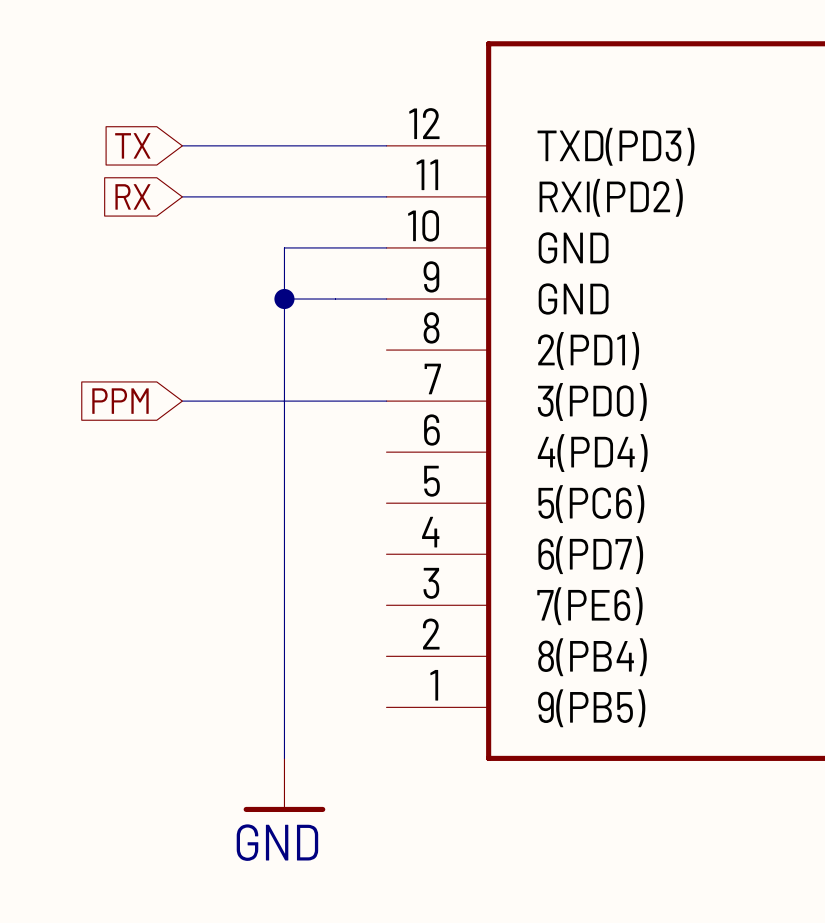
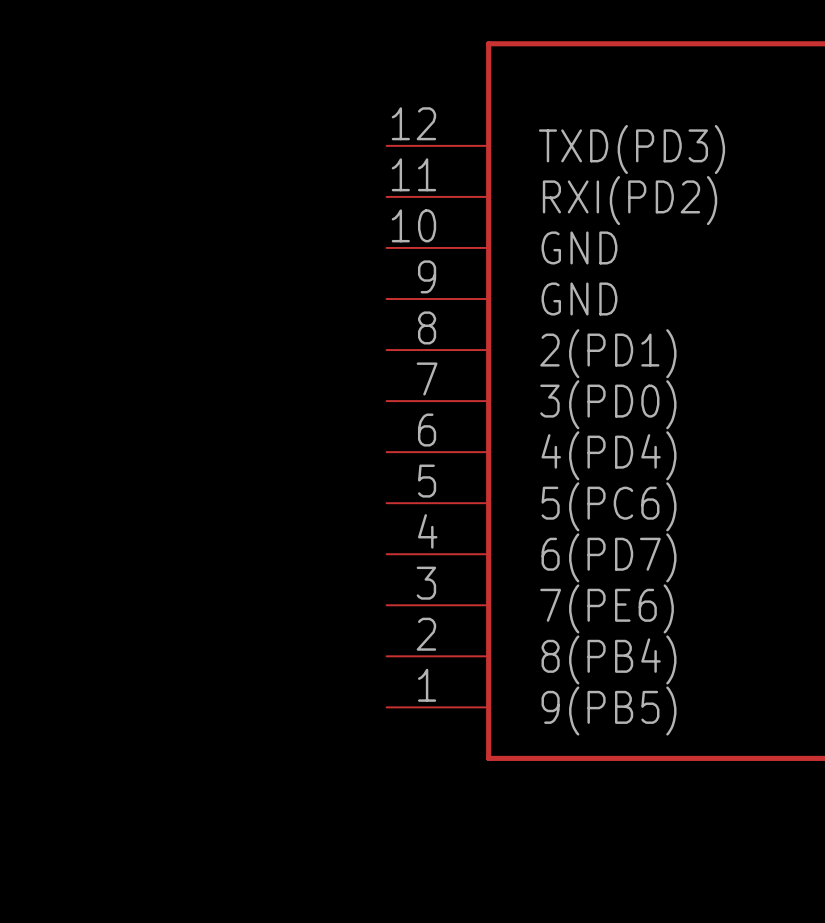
global label: TX (132, 145) -> none
wire: (182, 145) (386, 145) -> none
global label: RX (132, 196) -> none
wire: (182, 196) (386, 196) -> none
wire: (386, 247) (284, 247) (284, 758) -> none
wire: (284, 299) (386, 299) -> none
junction: (284, 299) -> none
global label: PPM (120, 401) -> none
wire: (182, 401) (386, 401) -> none
power symbol: GND (284, 785) -> none

